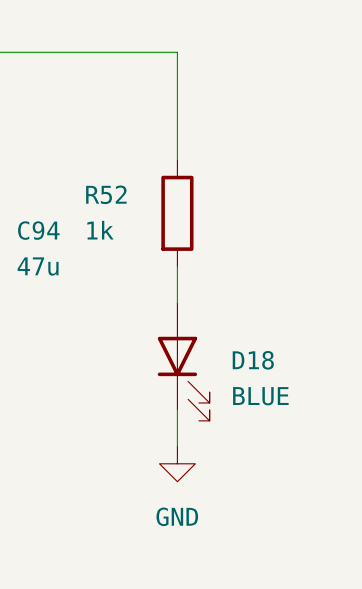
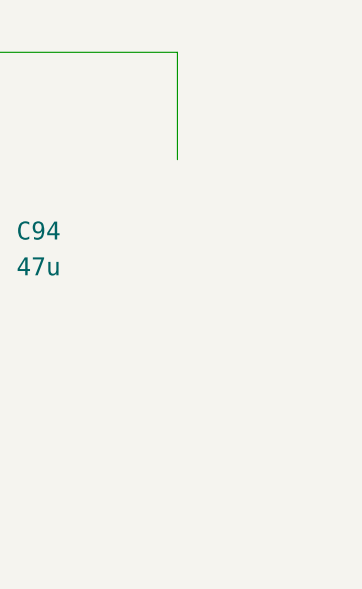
R52: 1k (177, 213) -> none
wire: (177, 267) (177, 302) -> none
D18: BLUE (183, 361) -> none
wire: (177, 410) (177, 445) -> none
power symbol: GND (177, 463) -> none

